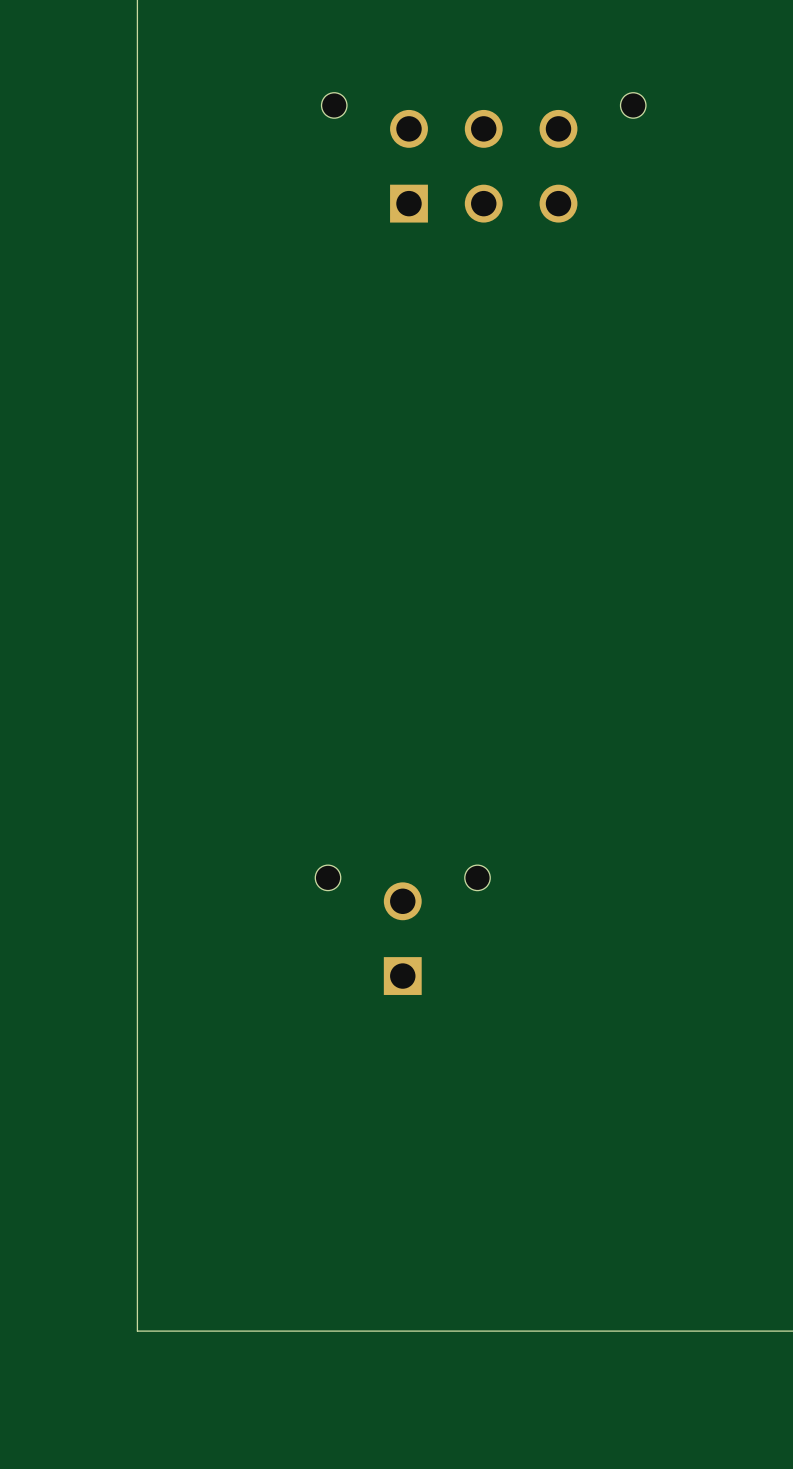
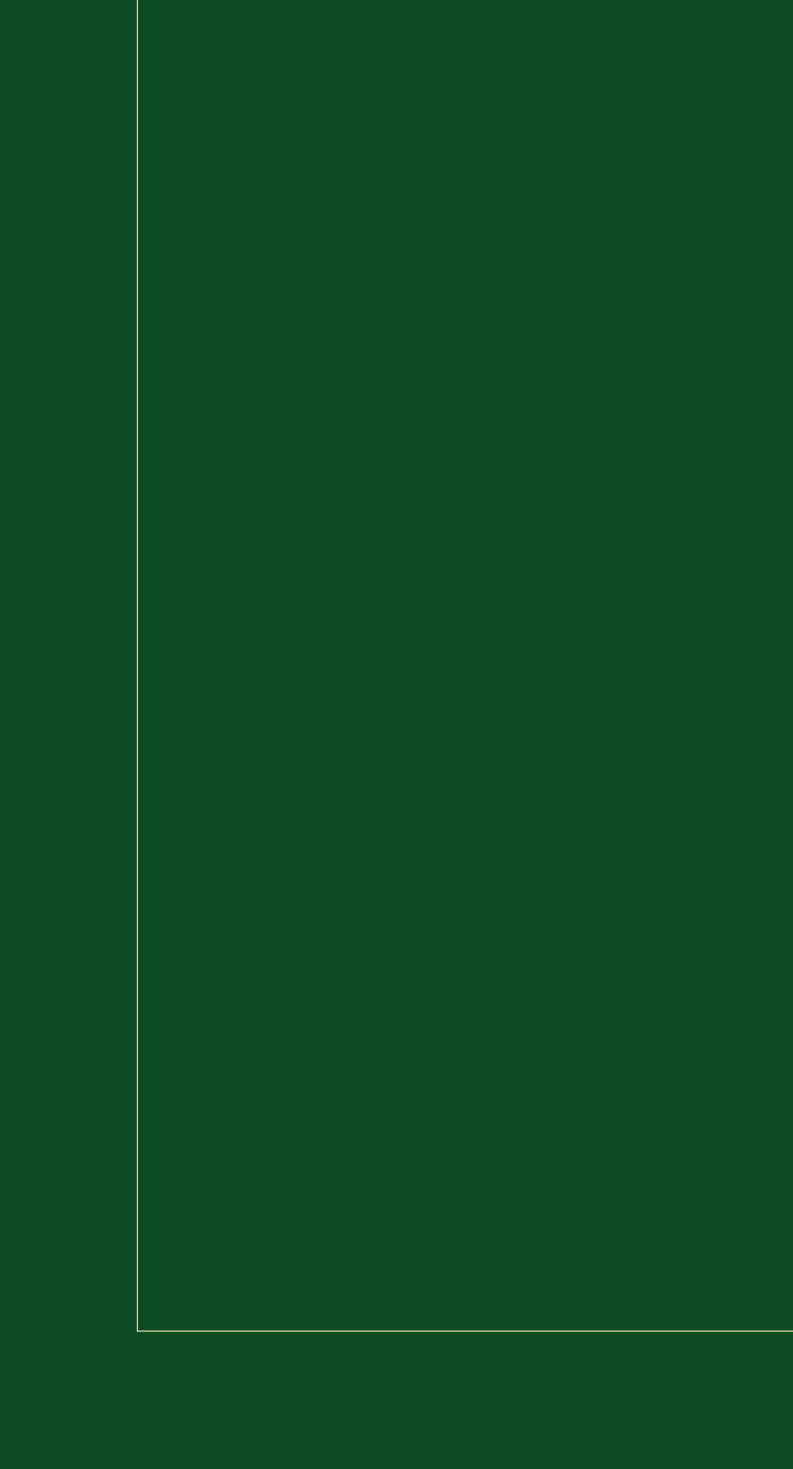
part: (483, 157) -> none
part: (402, 930) -> none

